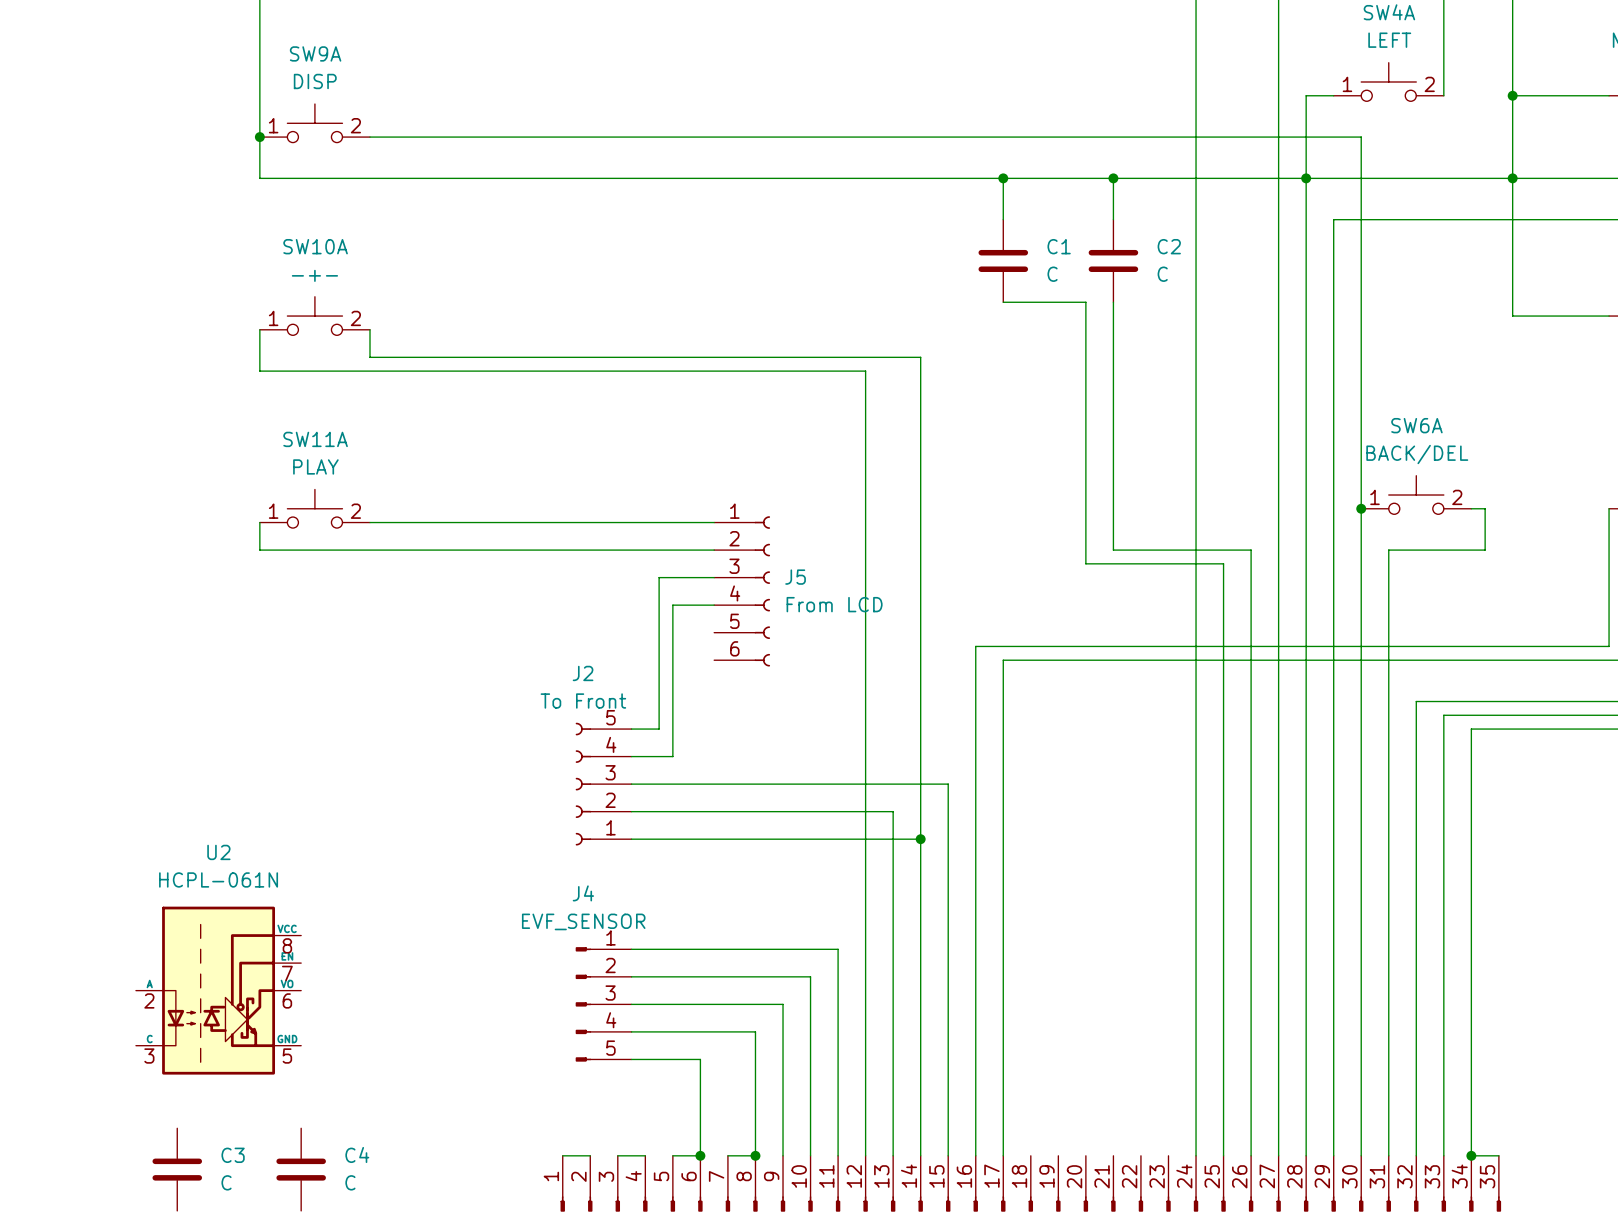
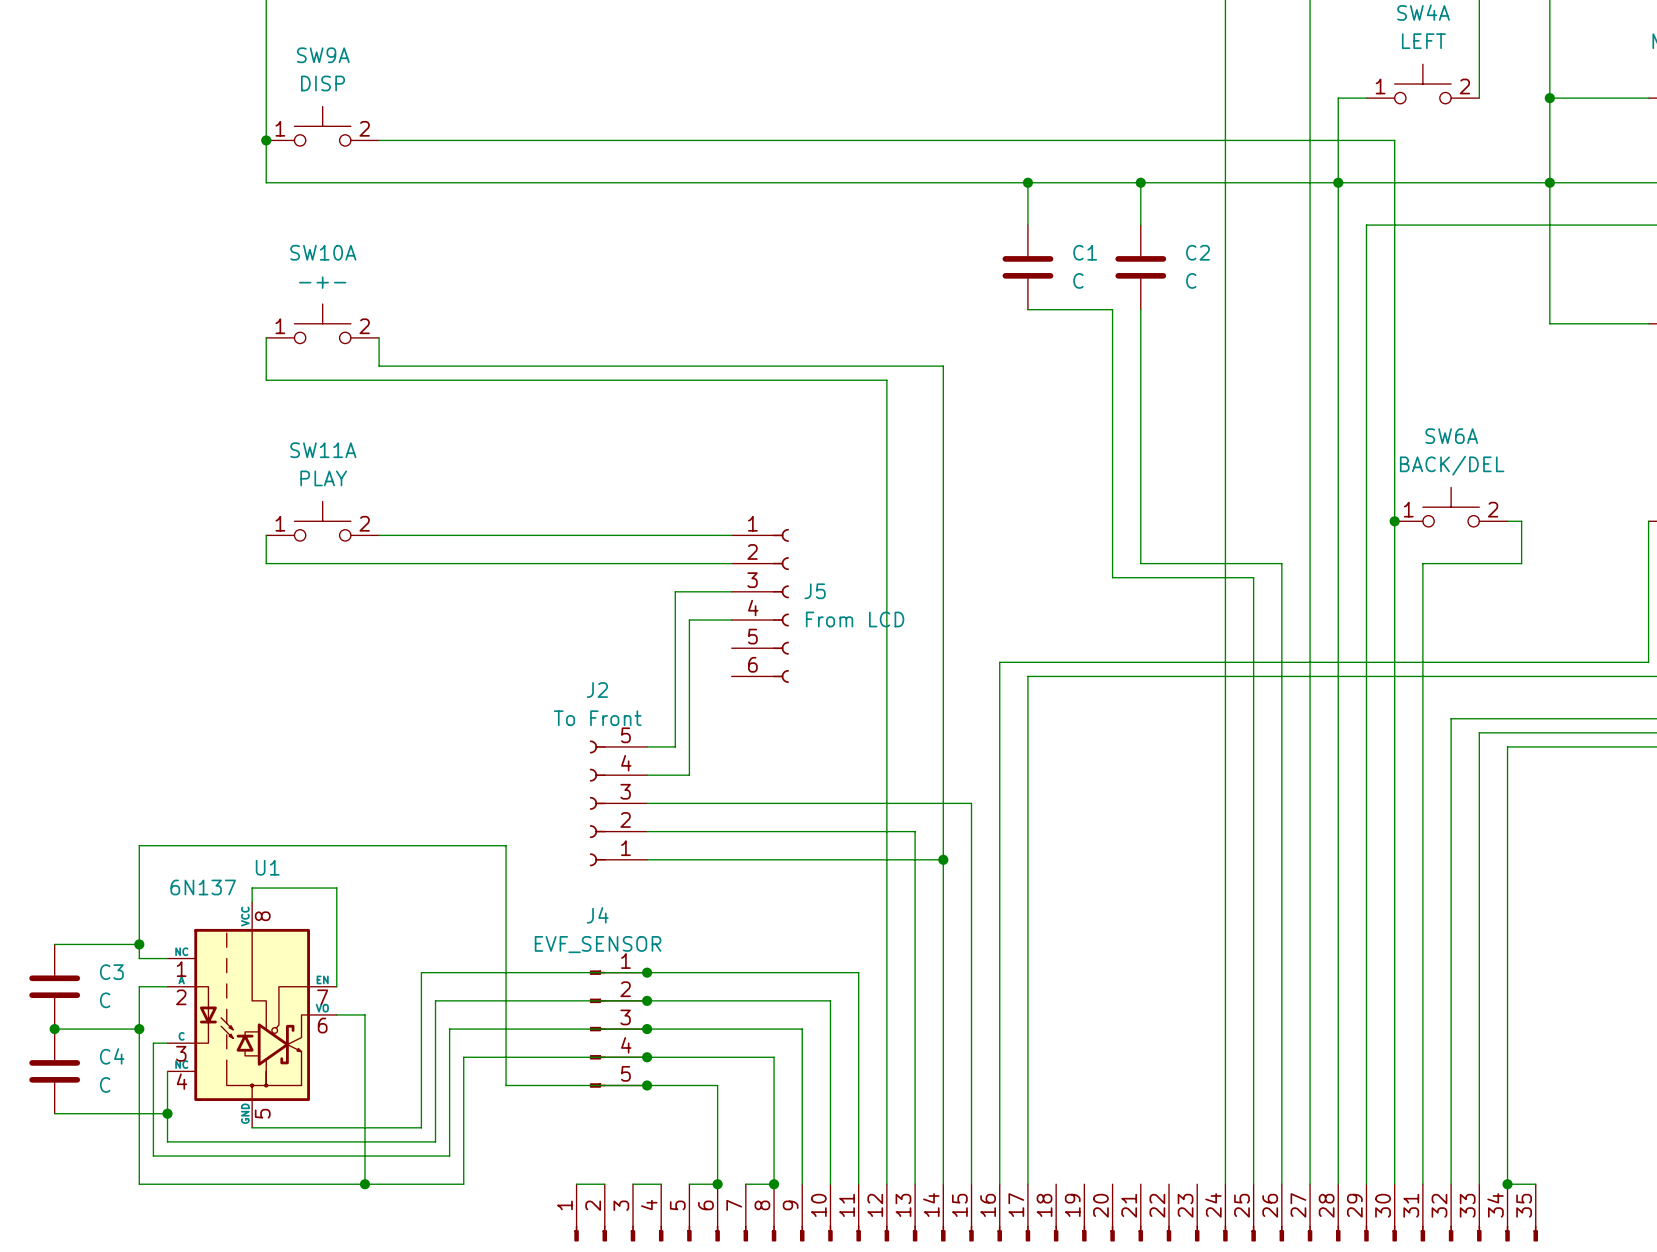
wire: none -> (252, 902) (252, 888) (336, 888) (336, 986)
wire: none -> (54, 944) (139, 944)
junction: none -> (139, 944)
wire: none -> (167, 958) (139, 958) (139, 845) (506, 845) (506, 1085) (647, 1085)
wire: none -> (647, 972) (421, 972) (421, 1127) (252, 1127)
junction: none -> (647, 972)
wire: none -> (167, 986) (139, 986) (139, 1184) (463, 1184) (463, 1057) (647, 1057)
wire: none -> (647, 1000) (435, 1000) (435, 1141) (167, 1141) (167, 1071)
junction: none -> (647, 1000)
U2: HCPL-061N (218, 990) -> none
U1: none -> 6N137 (252, 1014)
wire: none -> (336, 1014) (364, 1014) (364, 1184)
wire: none -> (54, 1029) (139, 1029)
junction: none -> (54, 1029)
junction: none -> (139, 1029)
wire: none -> (647, 1029) (449, 1029) (449, 1156) (153, 1156) (153, 1043) (167, 1043)
junction: none -> (647, 1029)
junction: none -> (647, 1057)
junction: none -> (647, 1085)
wire: none -> (54, 1113) (167, 1113)
junction: none -> (167, 1113)
junction: none -> (364, 1184)
C3 position: (177, 1169) -> (54, 986)
C4 position: (301, 1169) -> (54, 1071)

